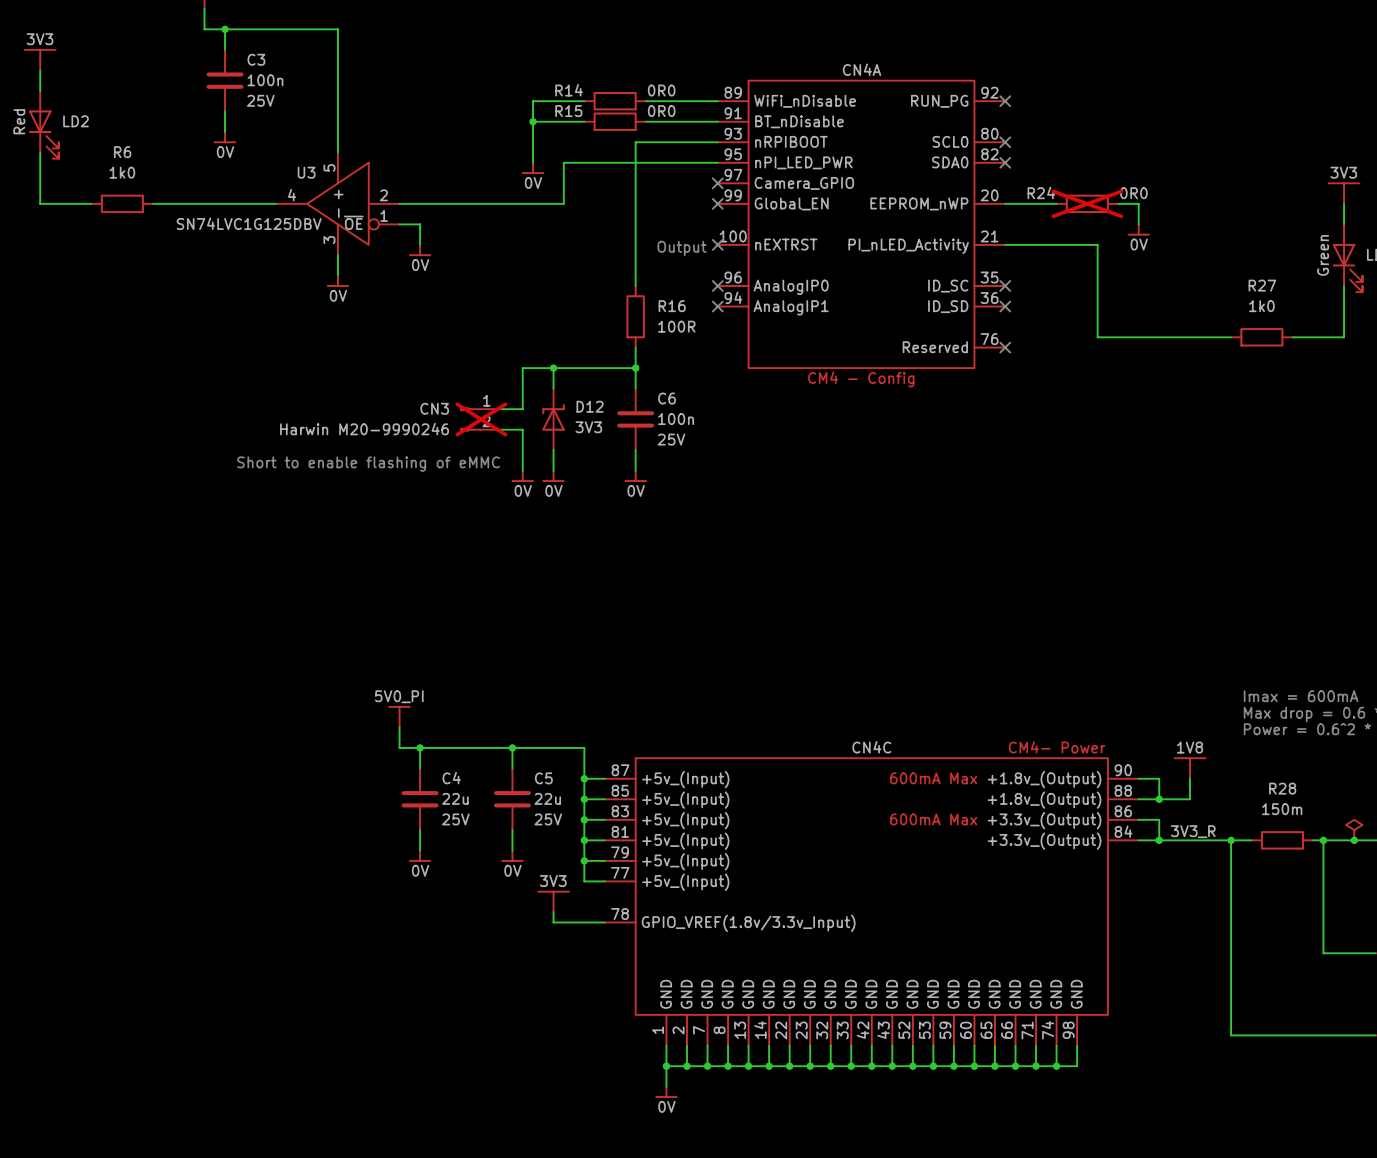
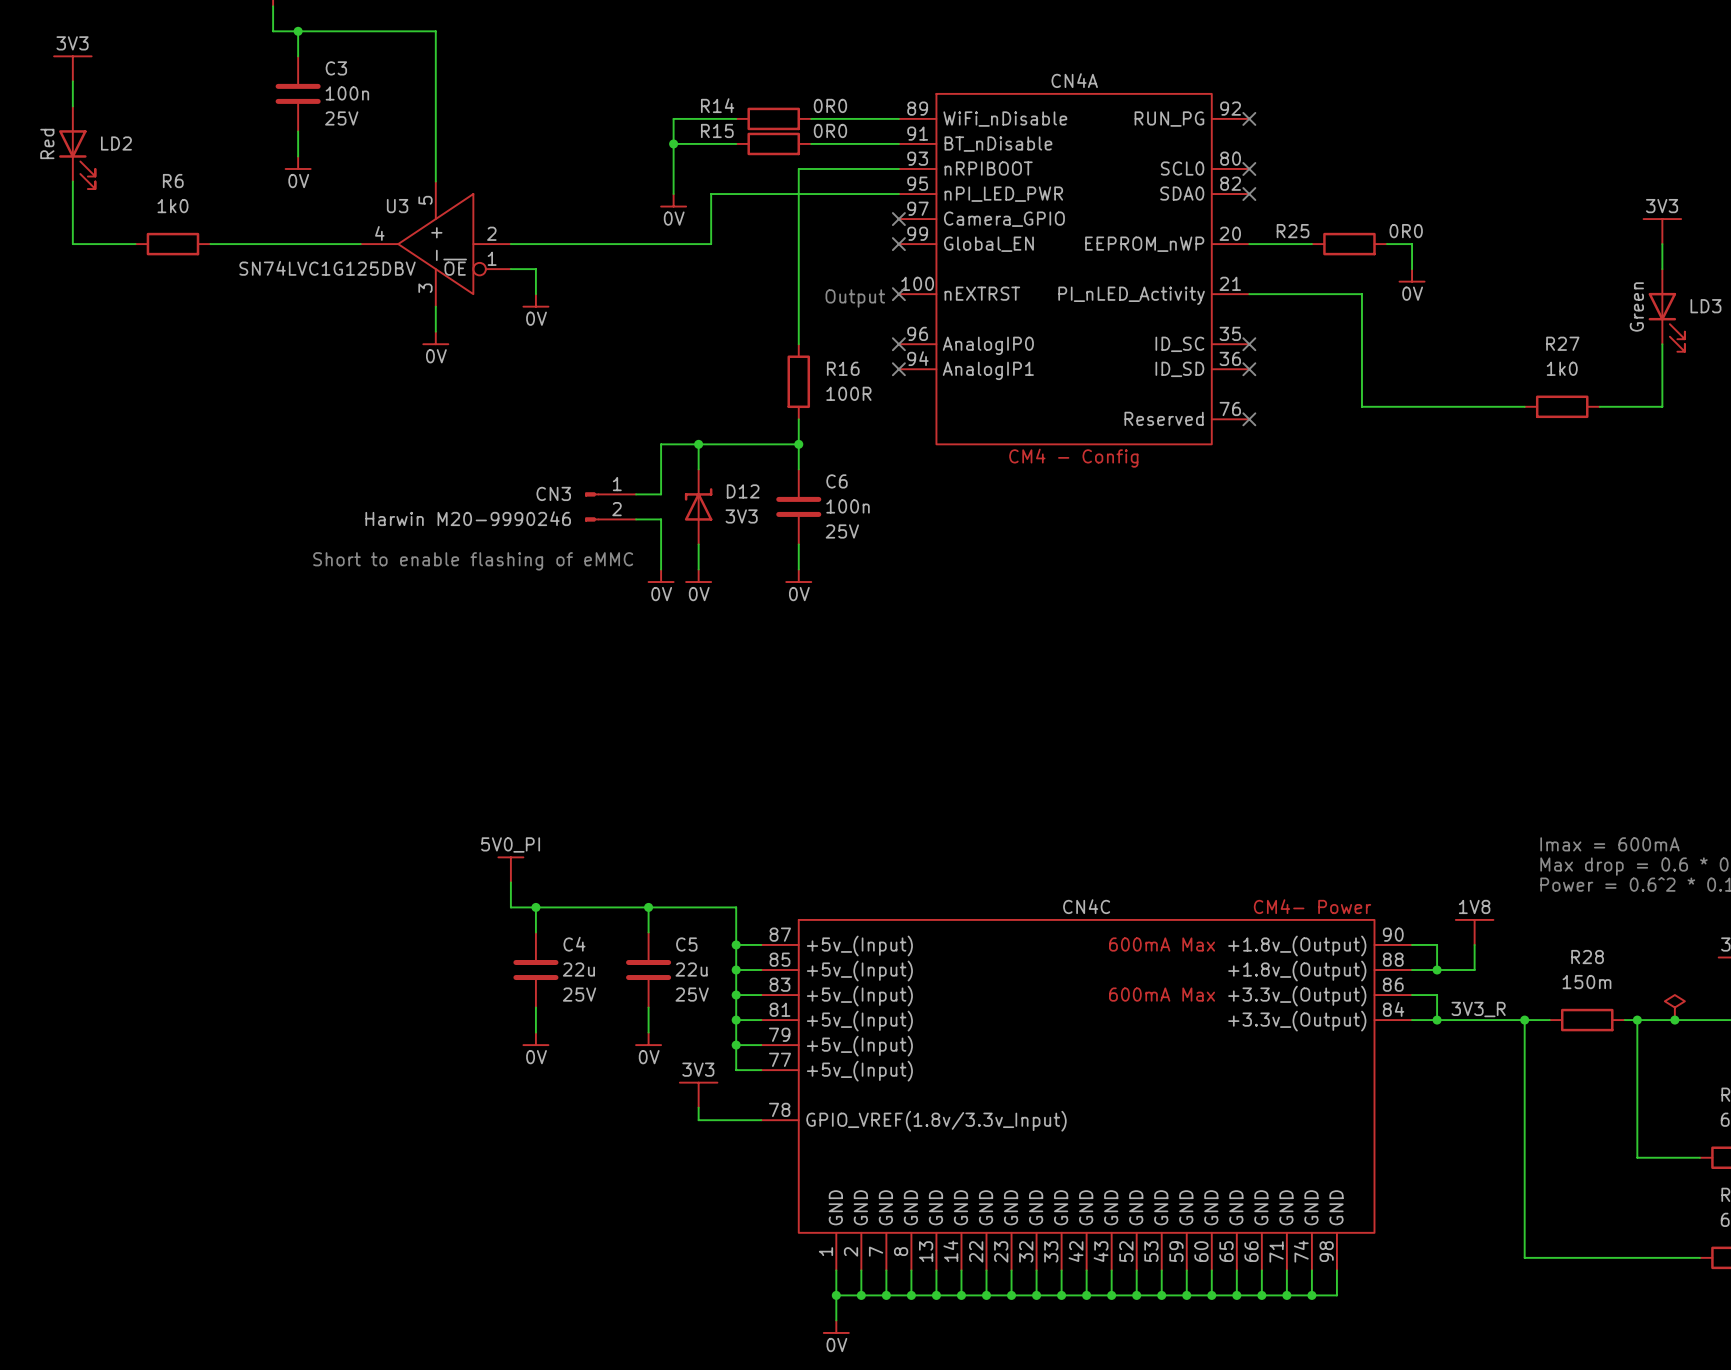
R24 name: R24 (1041, 192) -> R25 (1293, 231)
R24 do-not-place cross: (1087, 203) -> none
CN3 do-not-place cross: (481, 419) -> none

